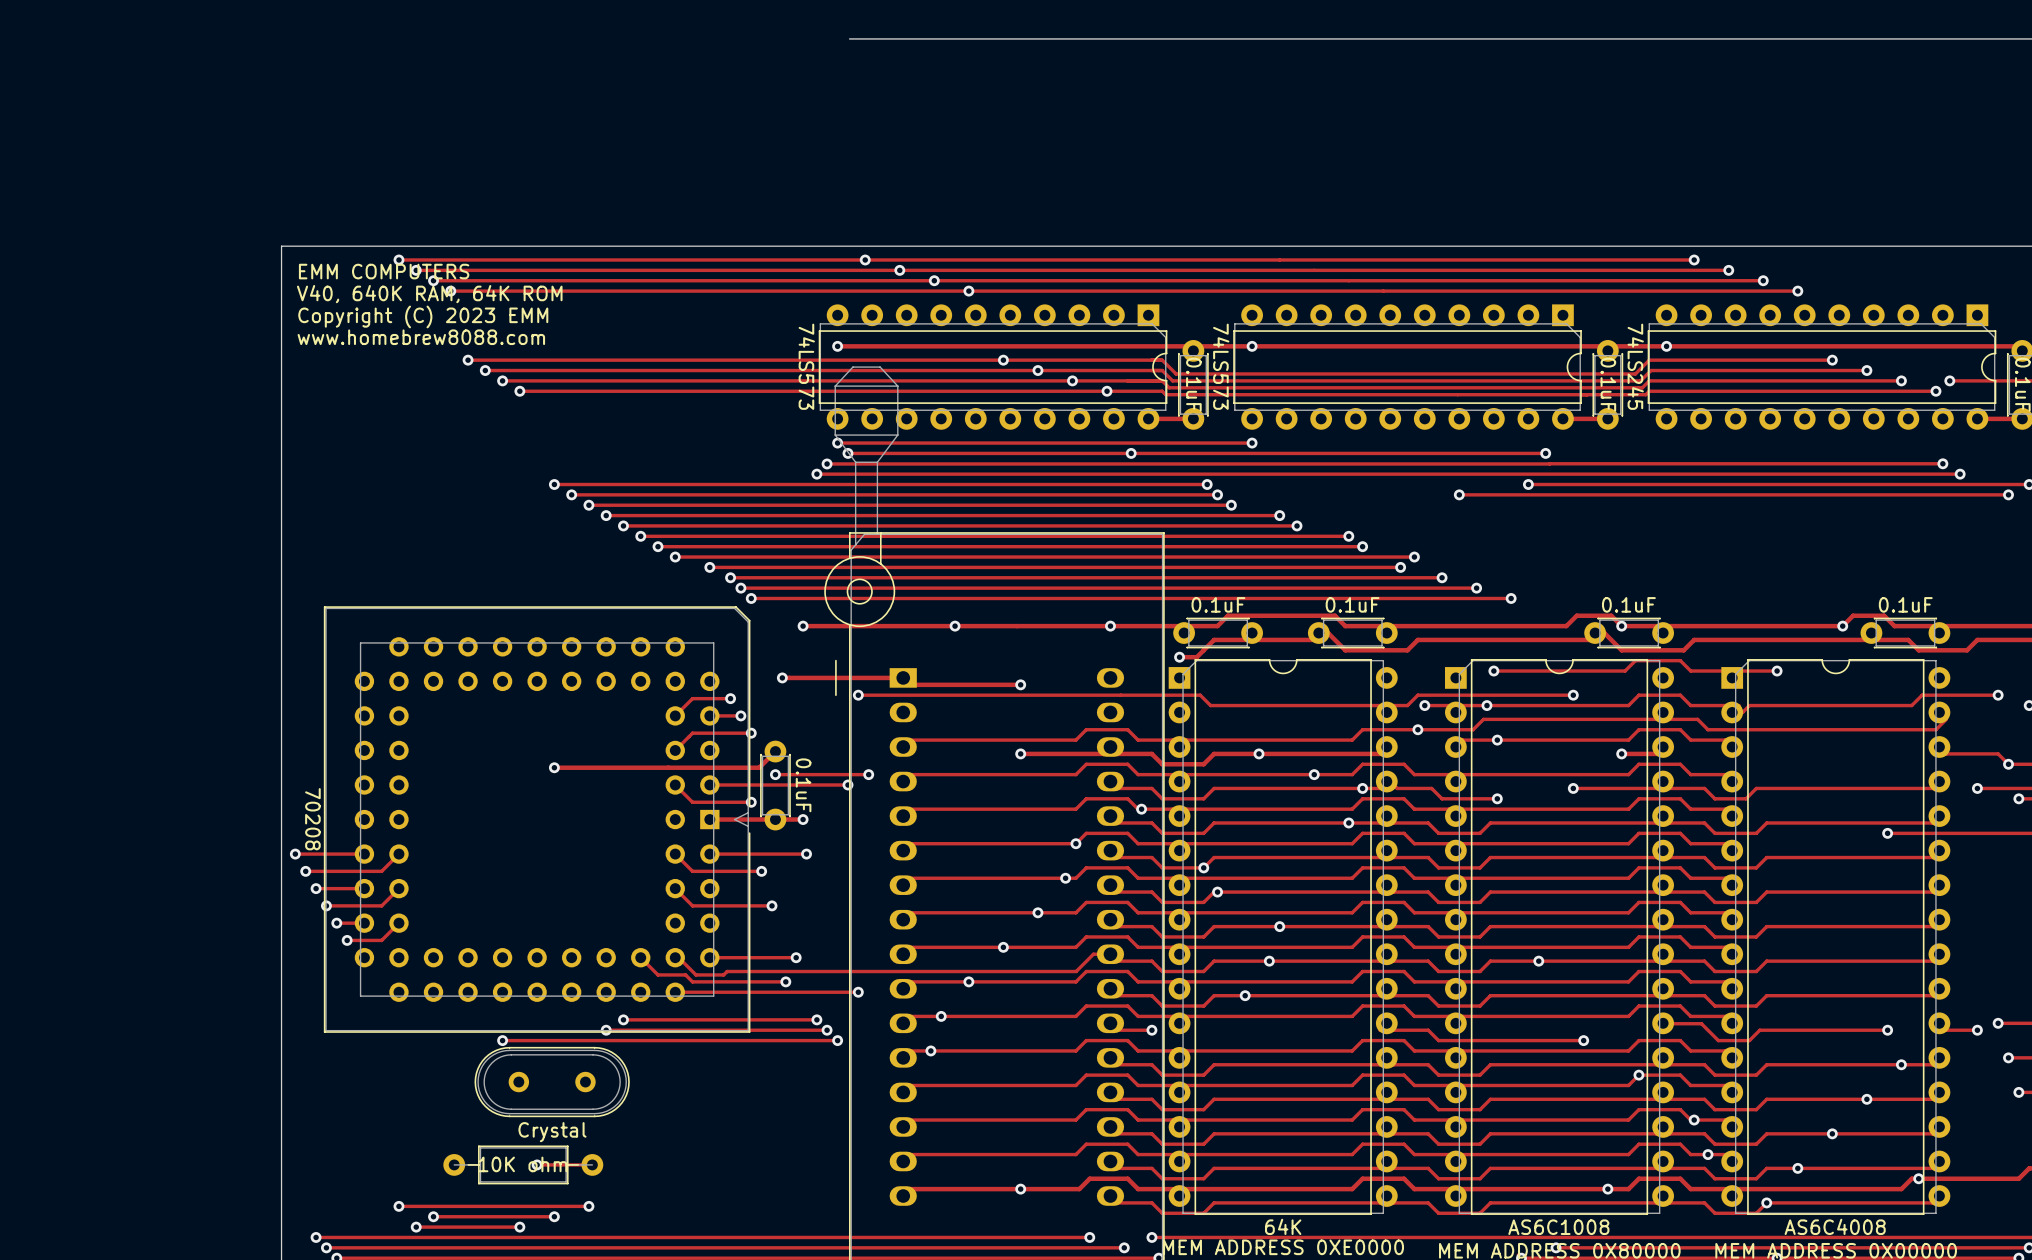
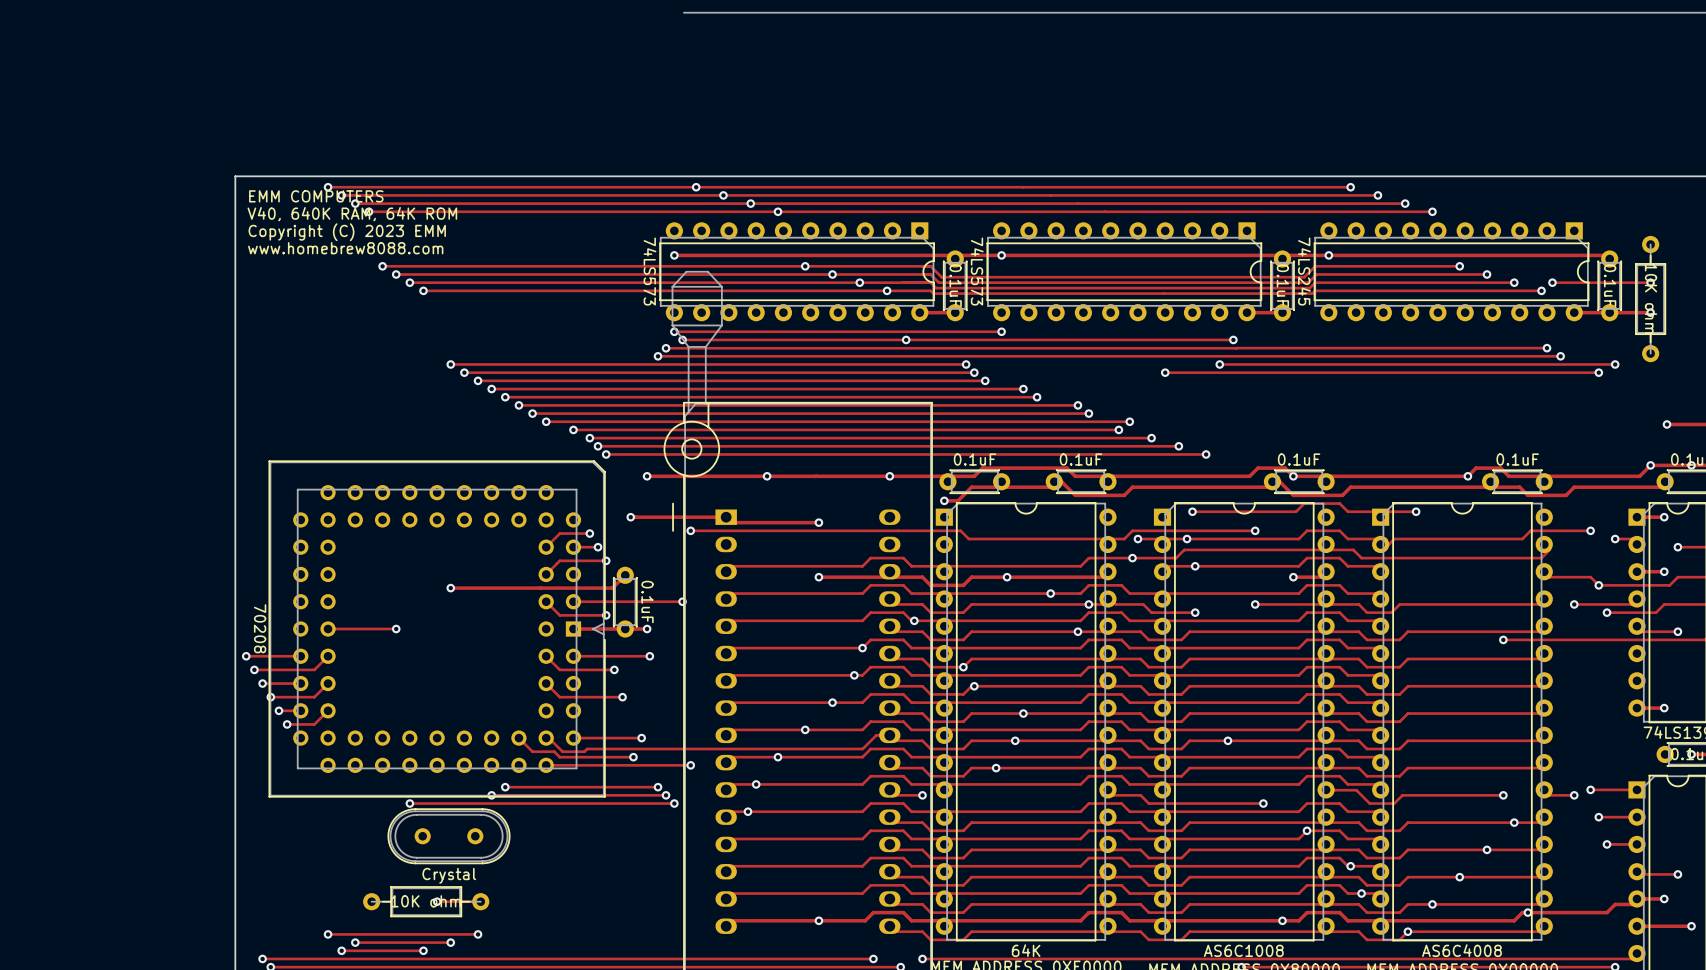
track: (775, 774) (868, 774) -> none
via: (775, 774) -> none
via: (868, 774) -> none
track: none -> (328, 629) (396, 629)
via: none -> (396, 629)

